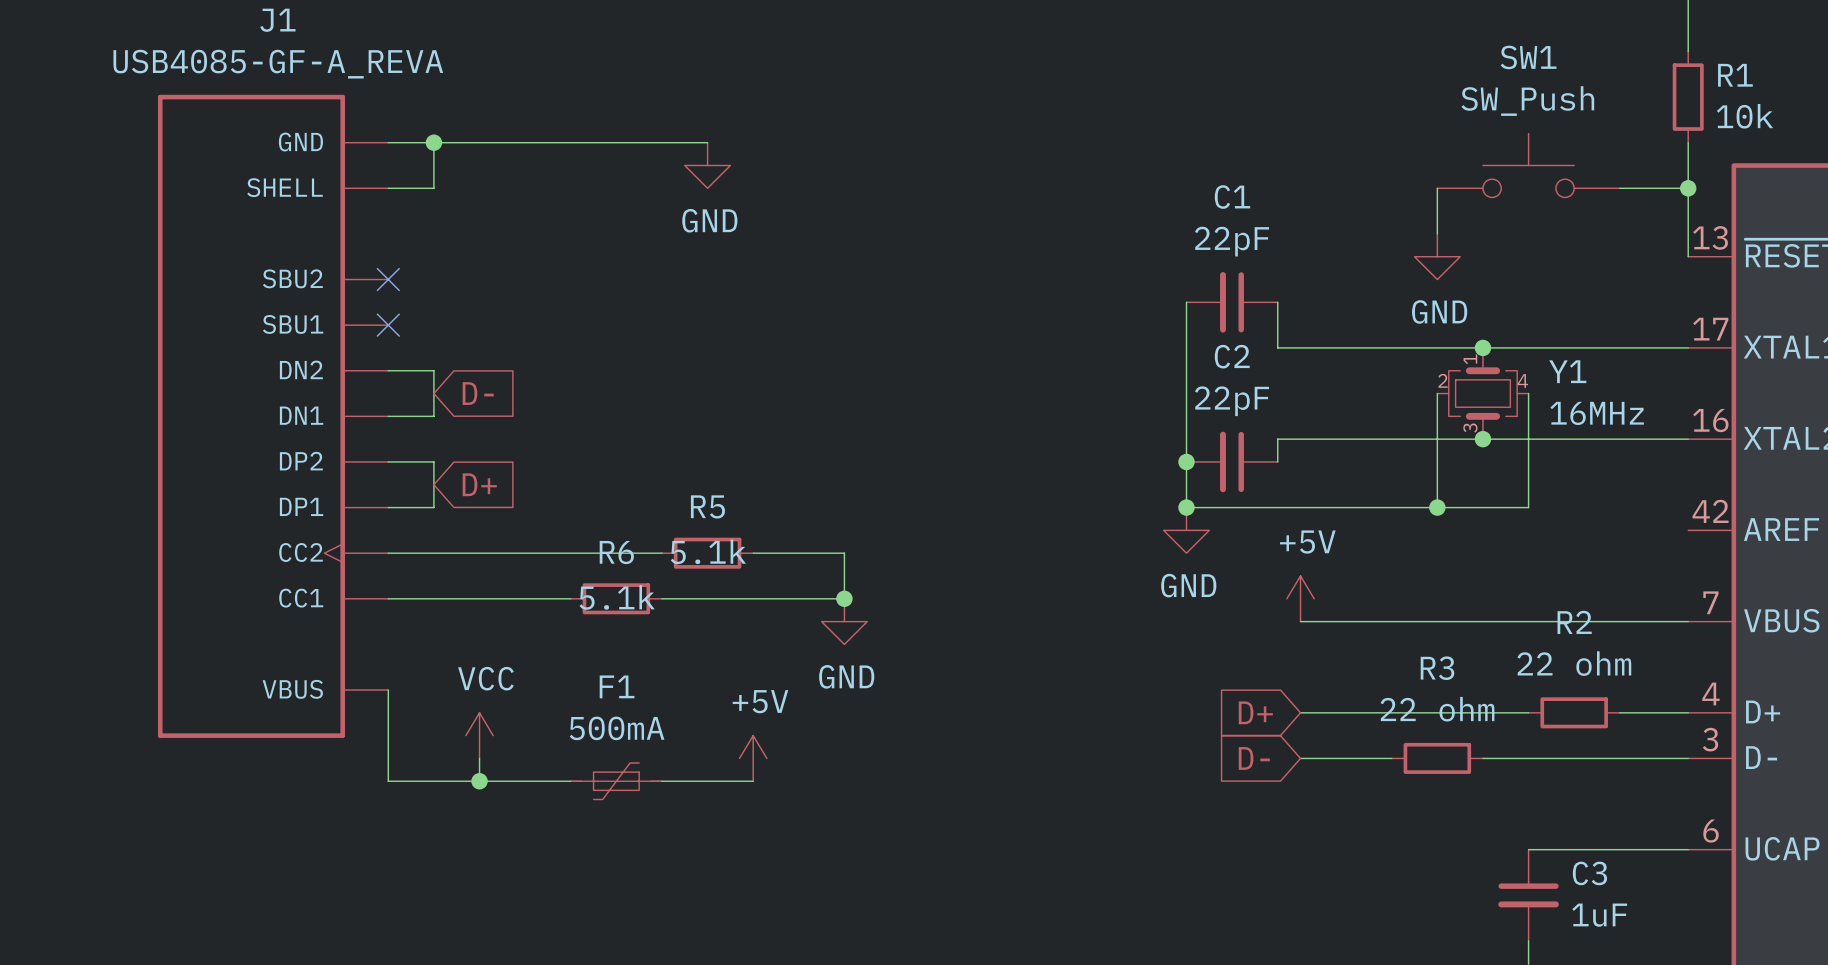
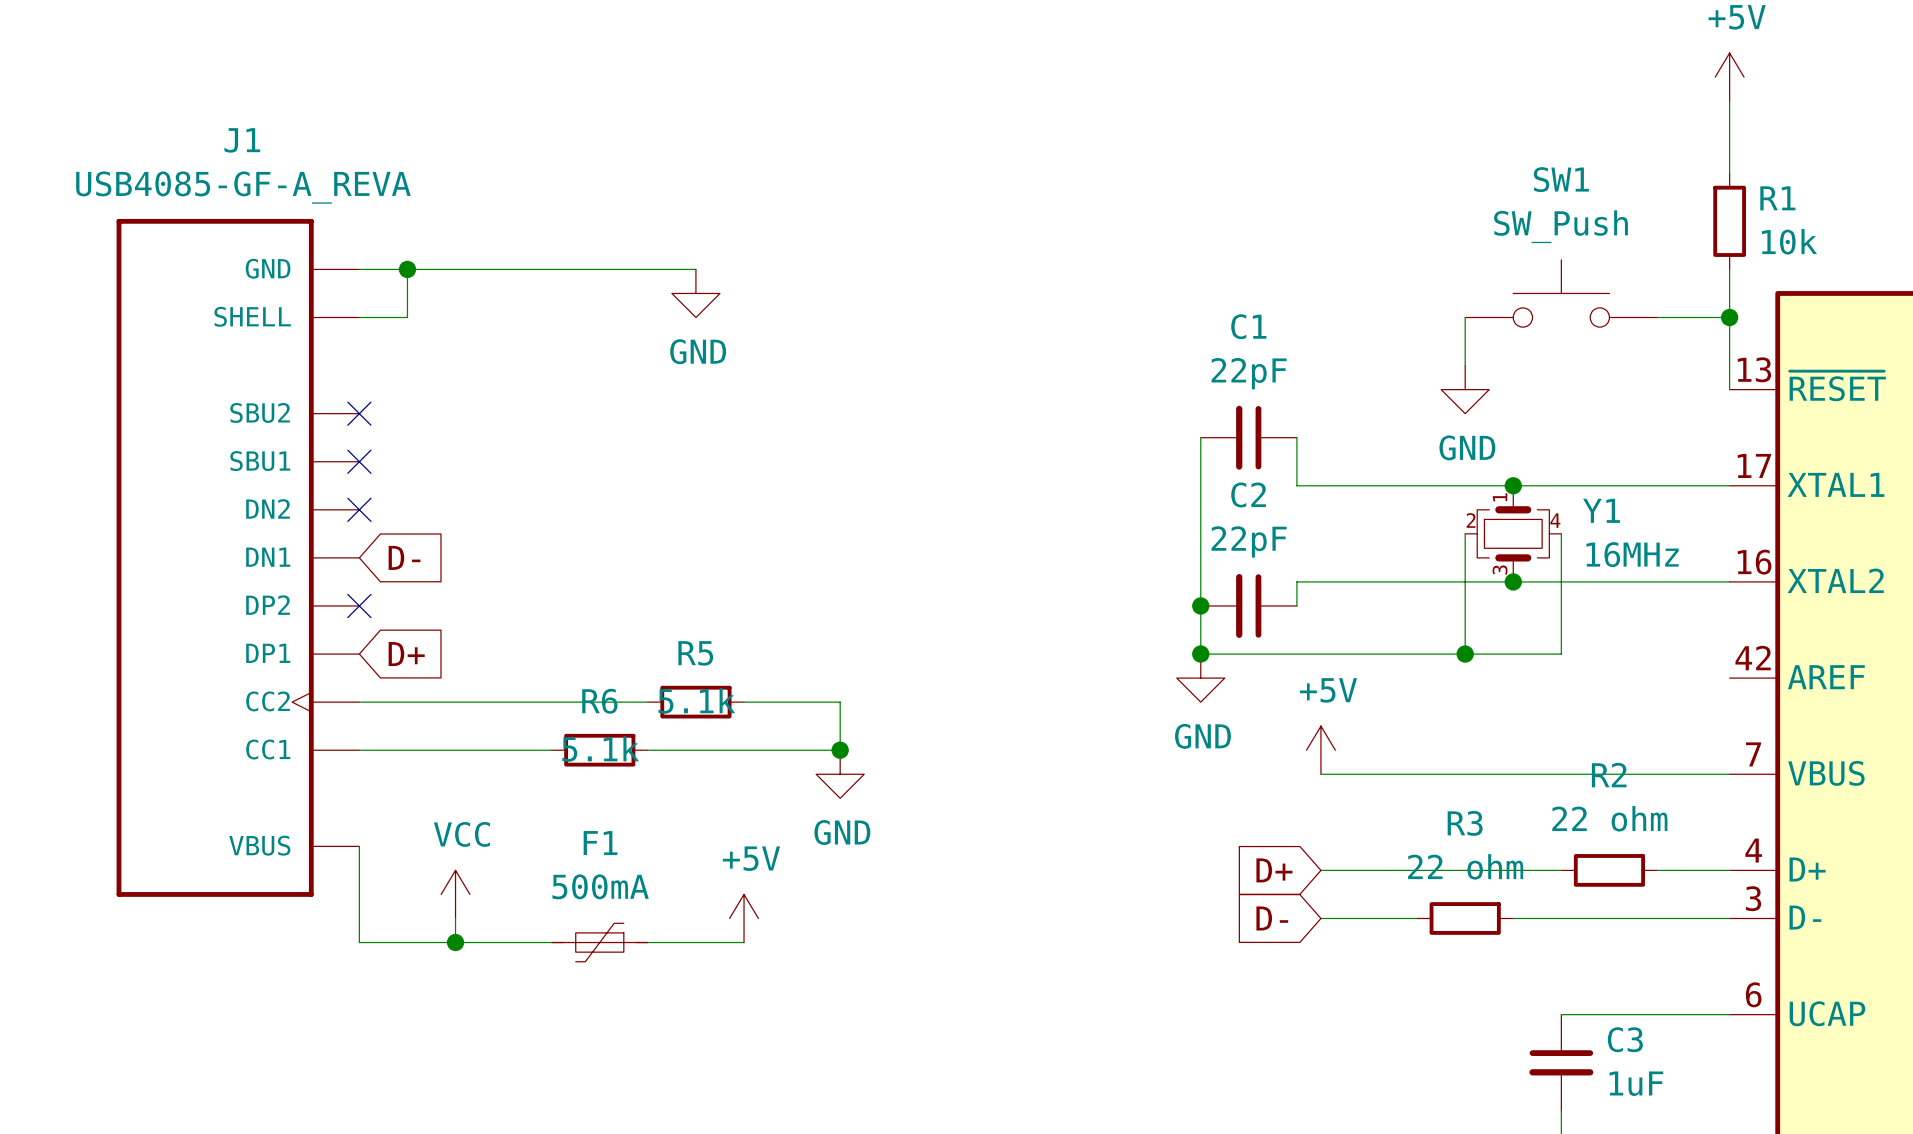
wire: (388, 370) (433, 370) (433, 416) (388, 416) -> none
no-connect mark: none -> (359, 509)
global label position: D- (478, 393) -> D- (404, 557)
wire: (388, 461) (433, 461) (433, 507) (388, 507) -> none
no-connect mark: none -> (359, 605)
global label position: D+ (479, 484) -> D+ (406, 654)

